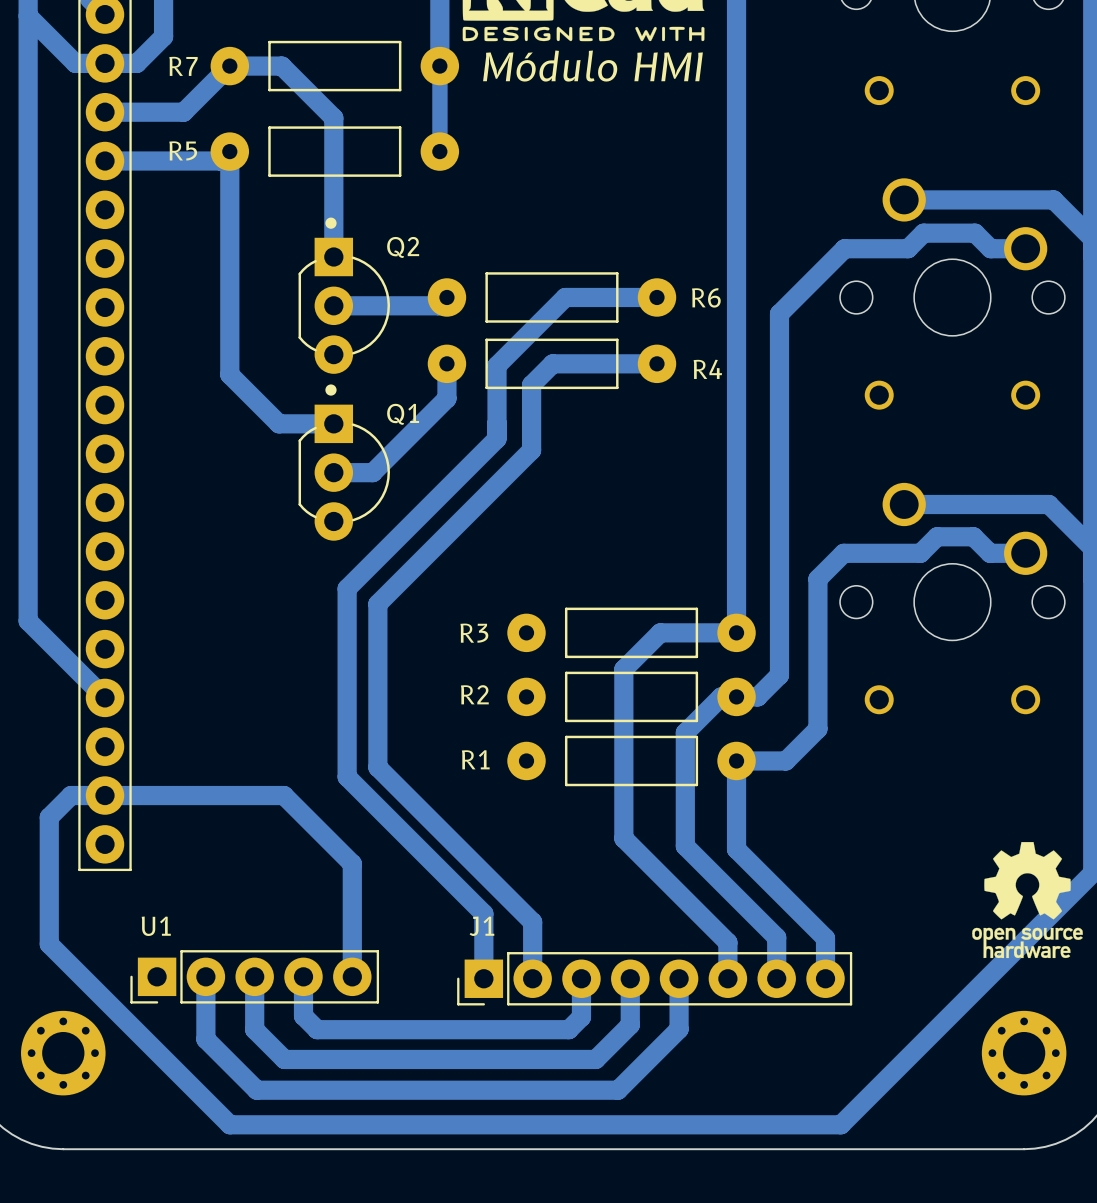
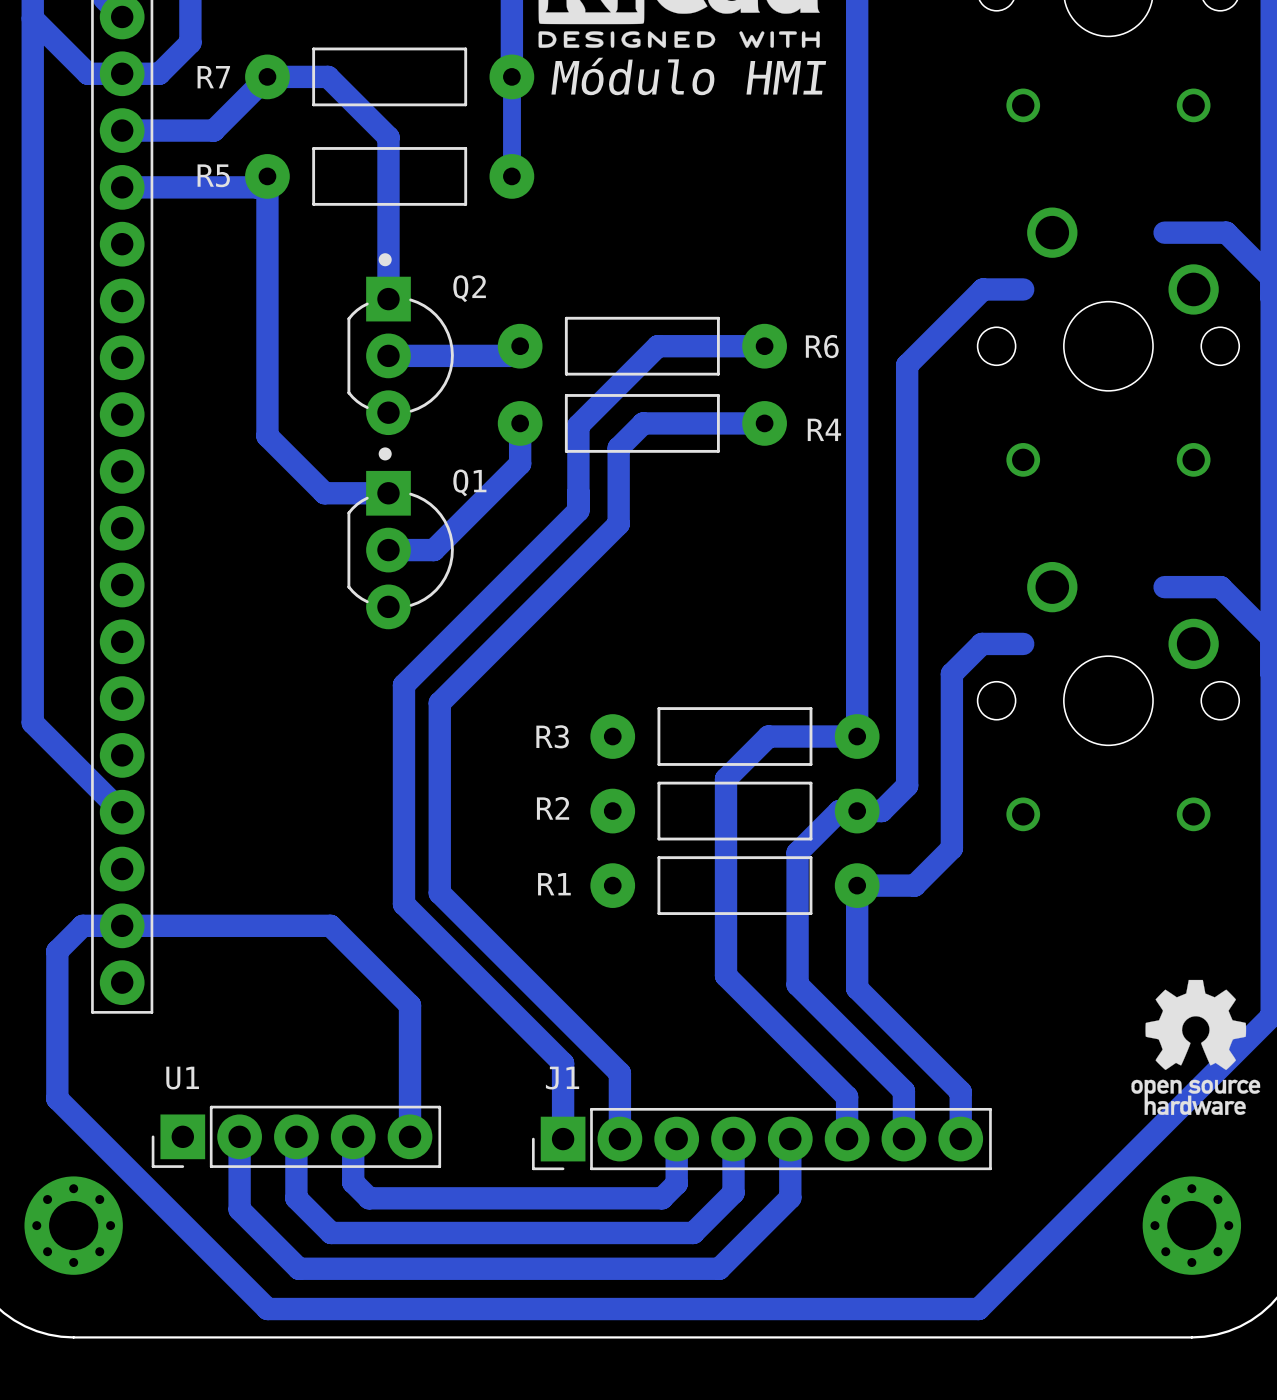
bottom track: (904, 199) (1000, 199) -> none
bottom track: (879, 248) (908, 248) (923, 233) (975, 233) (990, 248) (1025, 248) -> none
bottom track: (904, 504) (1000, 504) -> none
bottom track: (879, 553) (920, 553) (937, 536) (973, 536) (990, 553) (1025, 553) -> none

